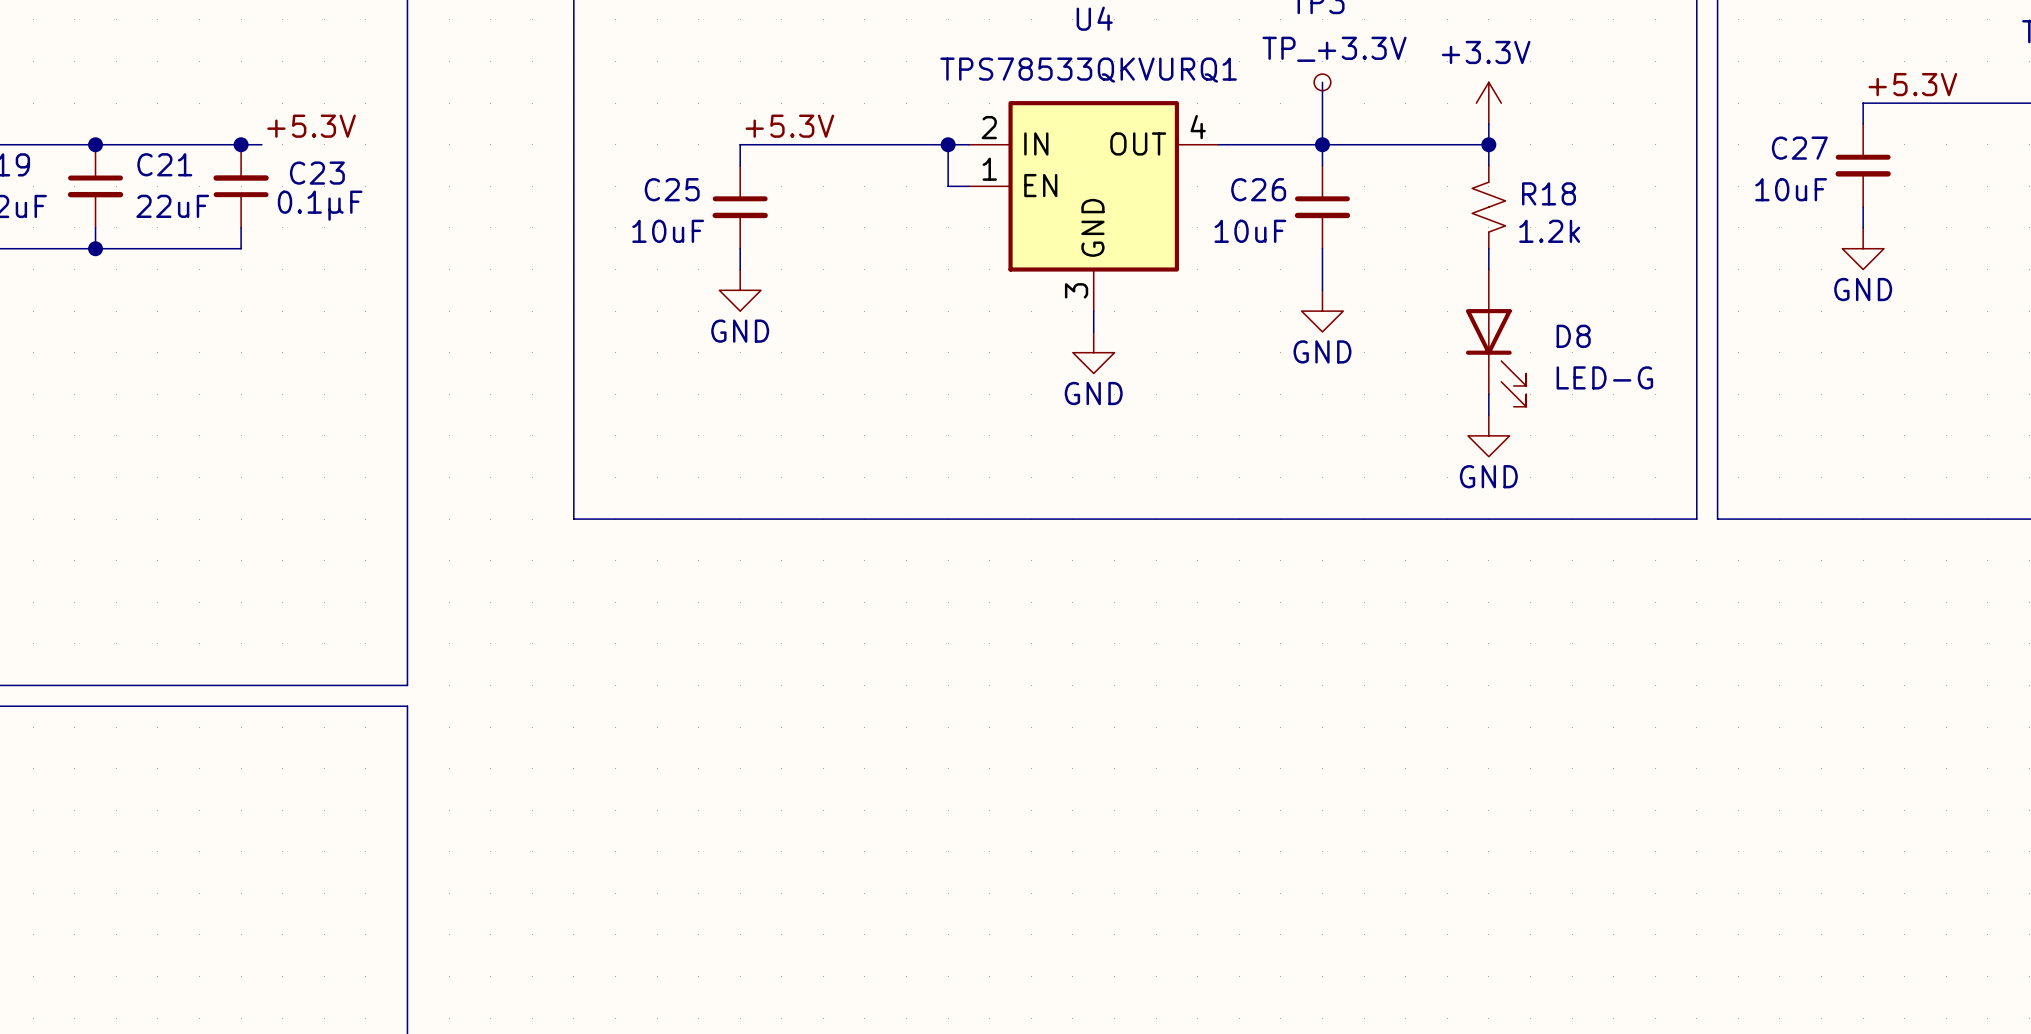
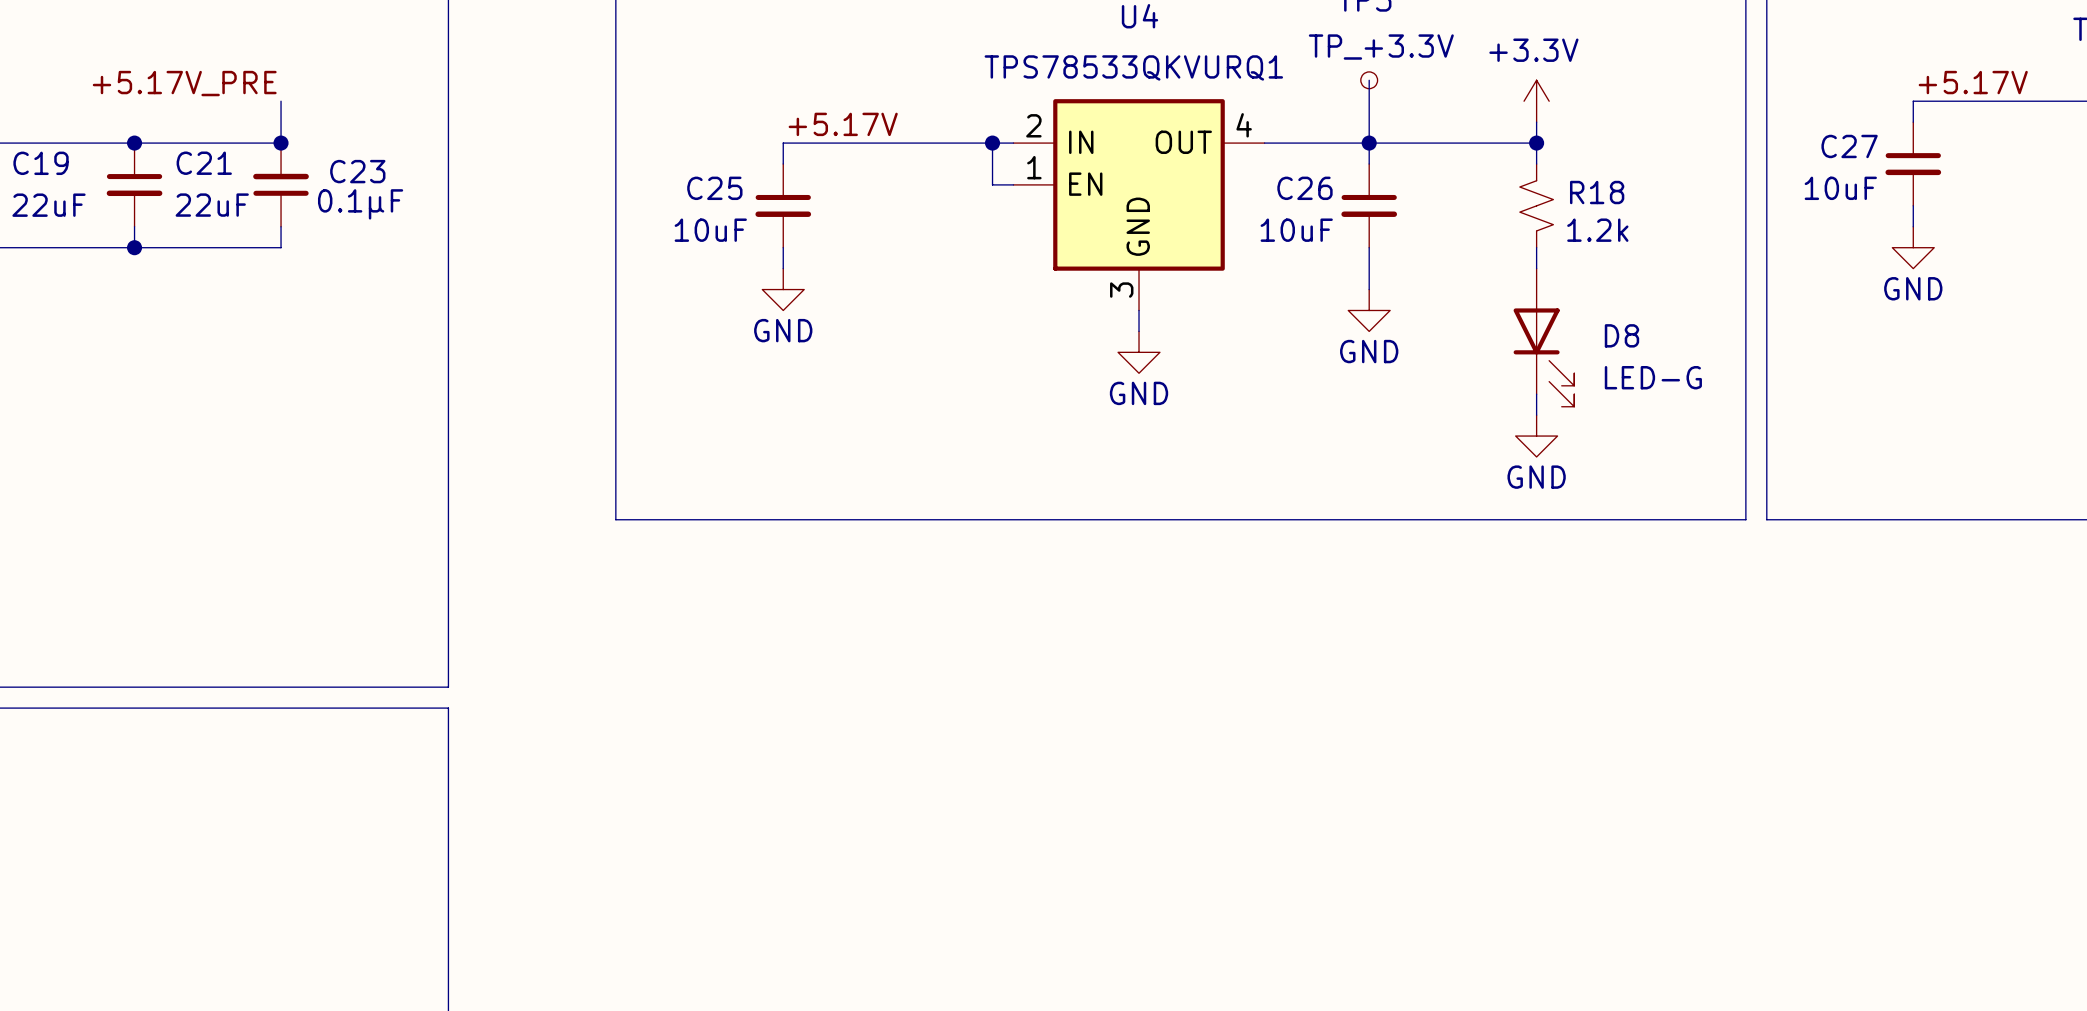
label: +5.3V (1912, 84) -> +5.17V (1973, 82)
label: none -> +5.17V_PRE (184, 83)
label: +5.3V (311, 126) -> none
label: +5.3V (789, 126) -> +5.17V (843, 124)
wire: (241, 144) (261, 144) -> (281, 143) (281, 101)

